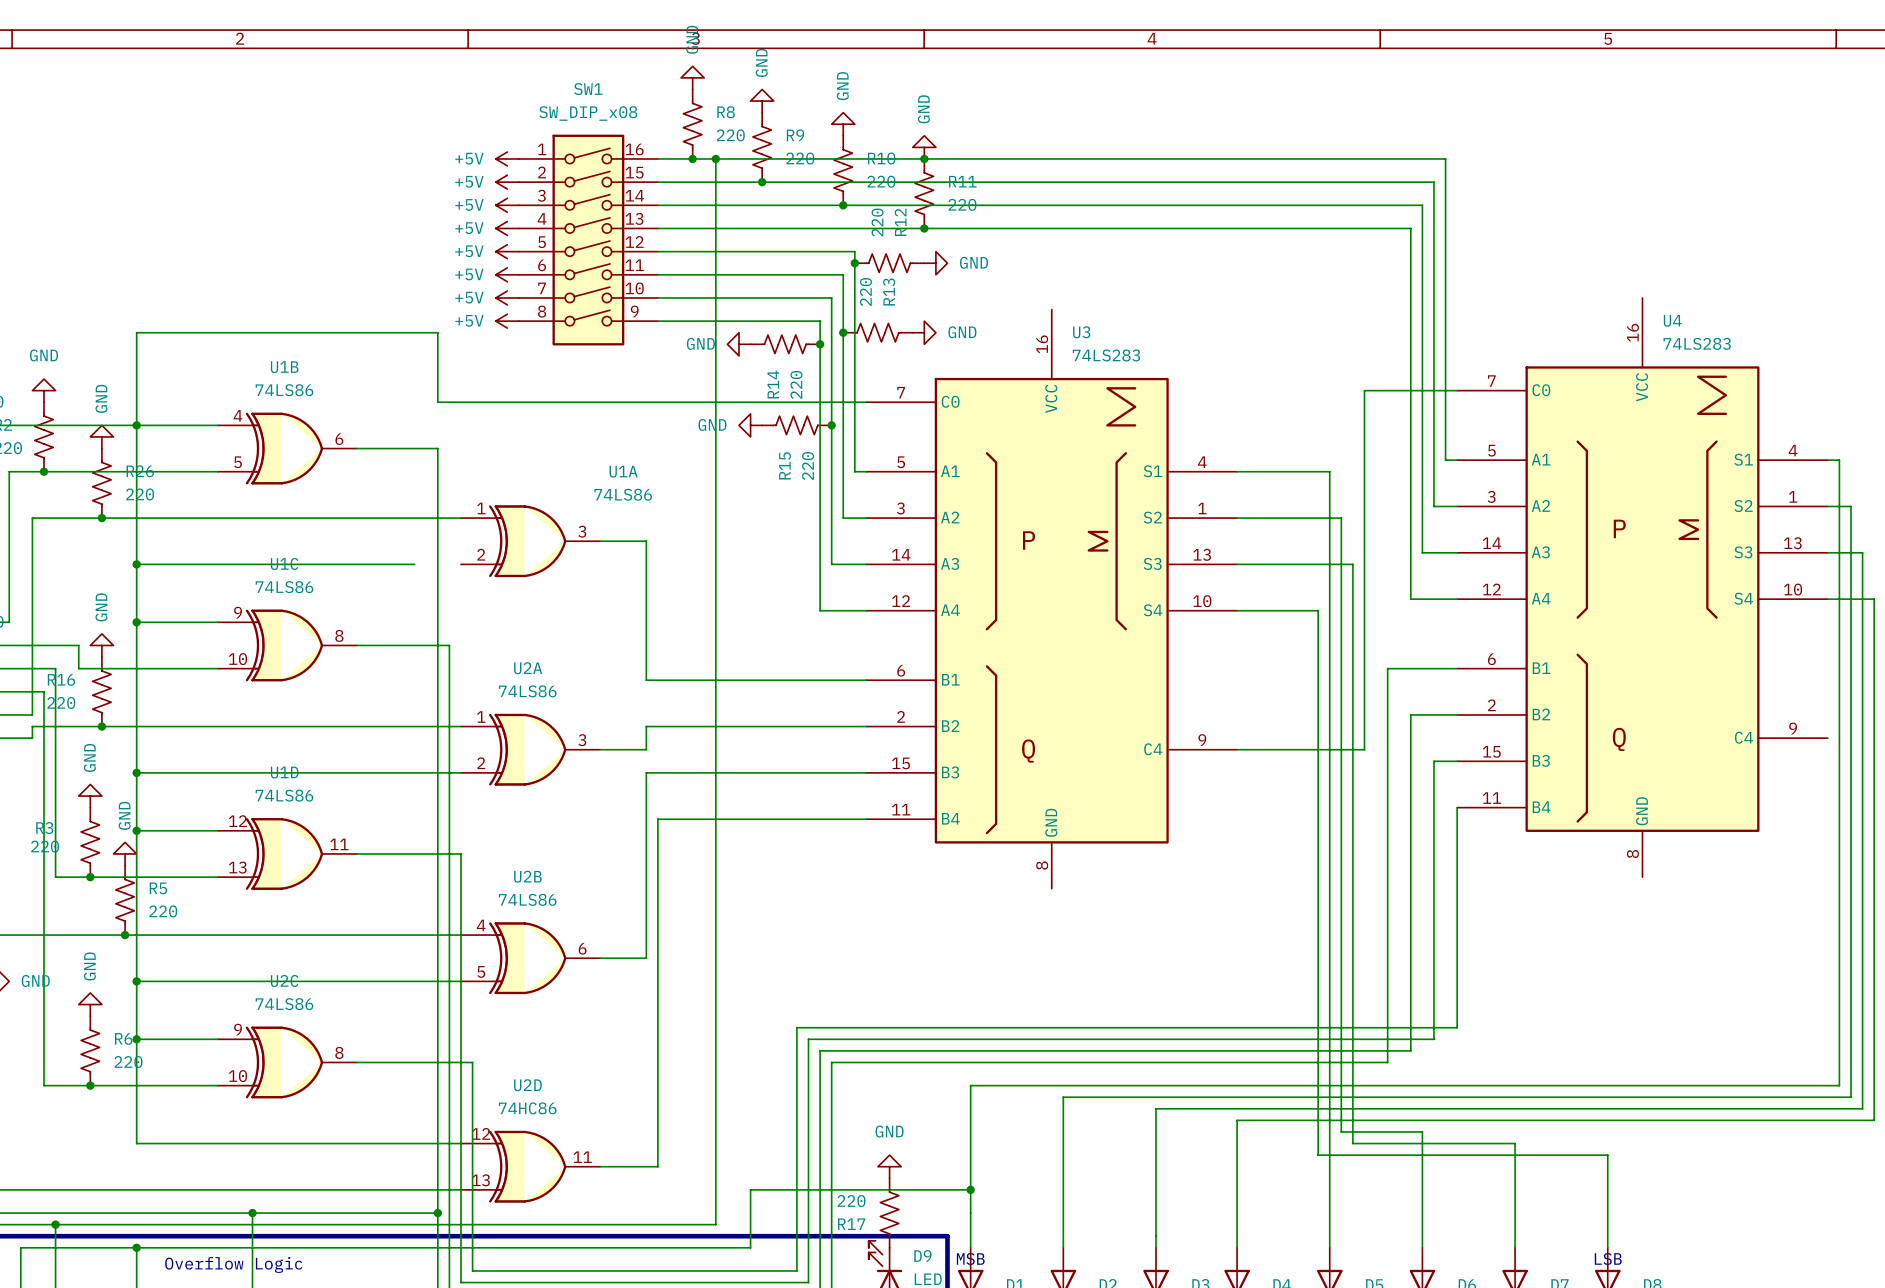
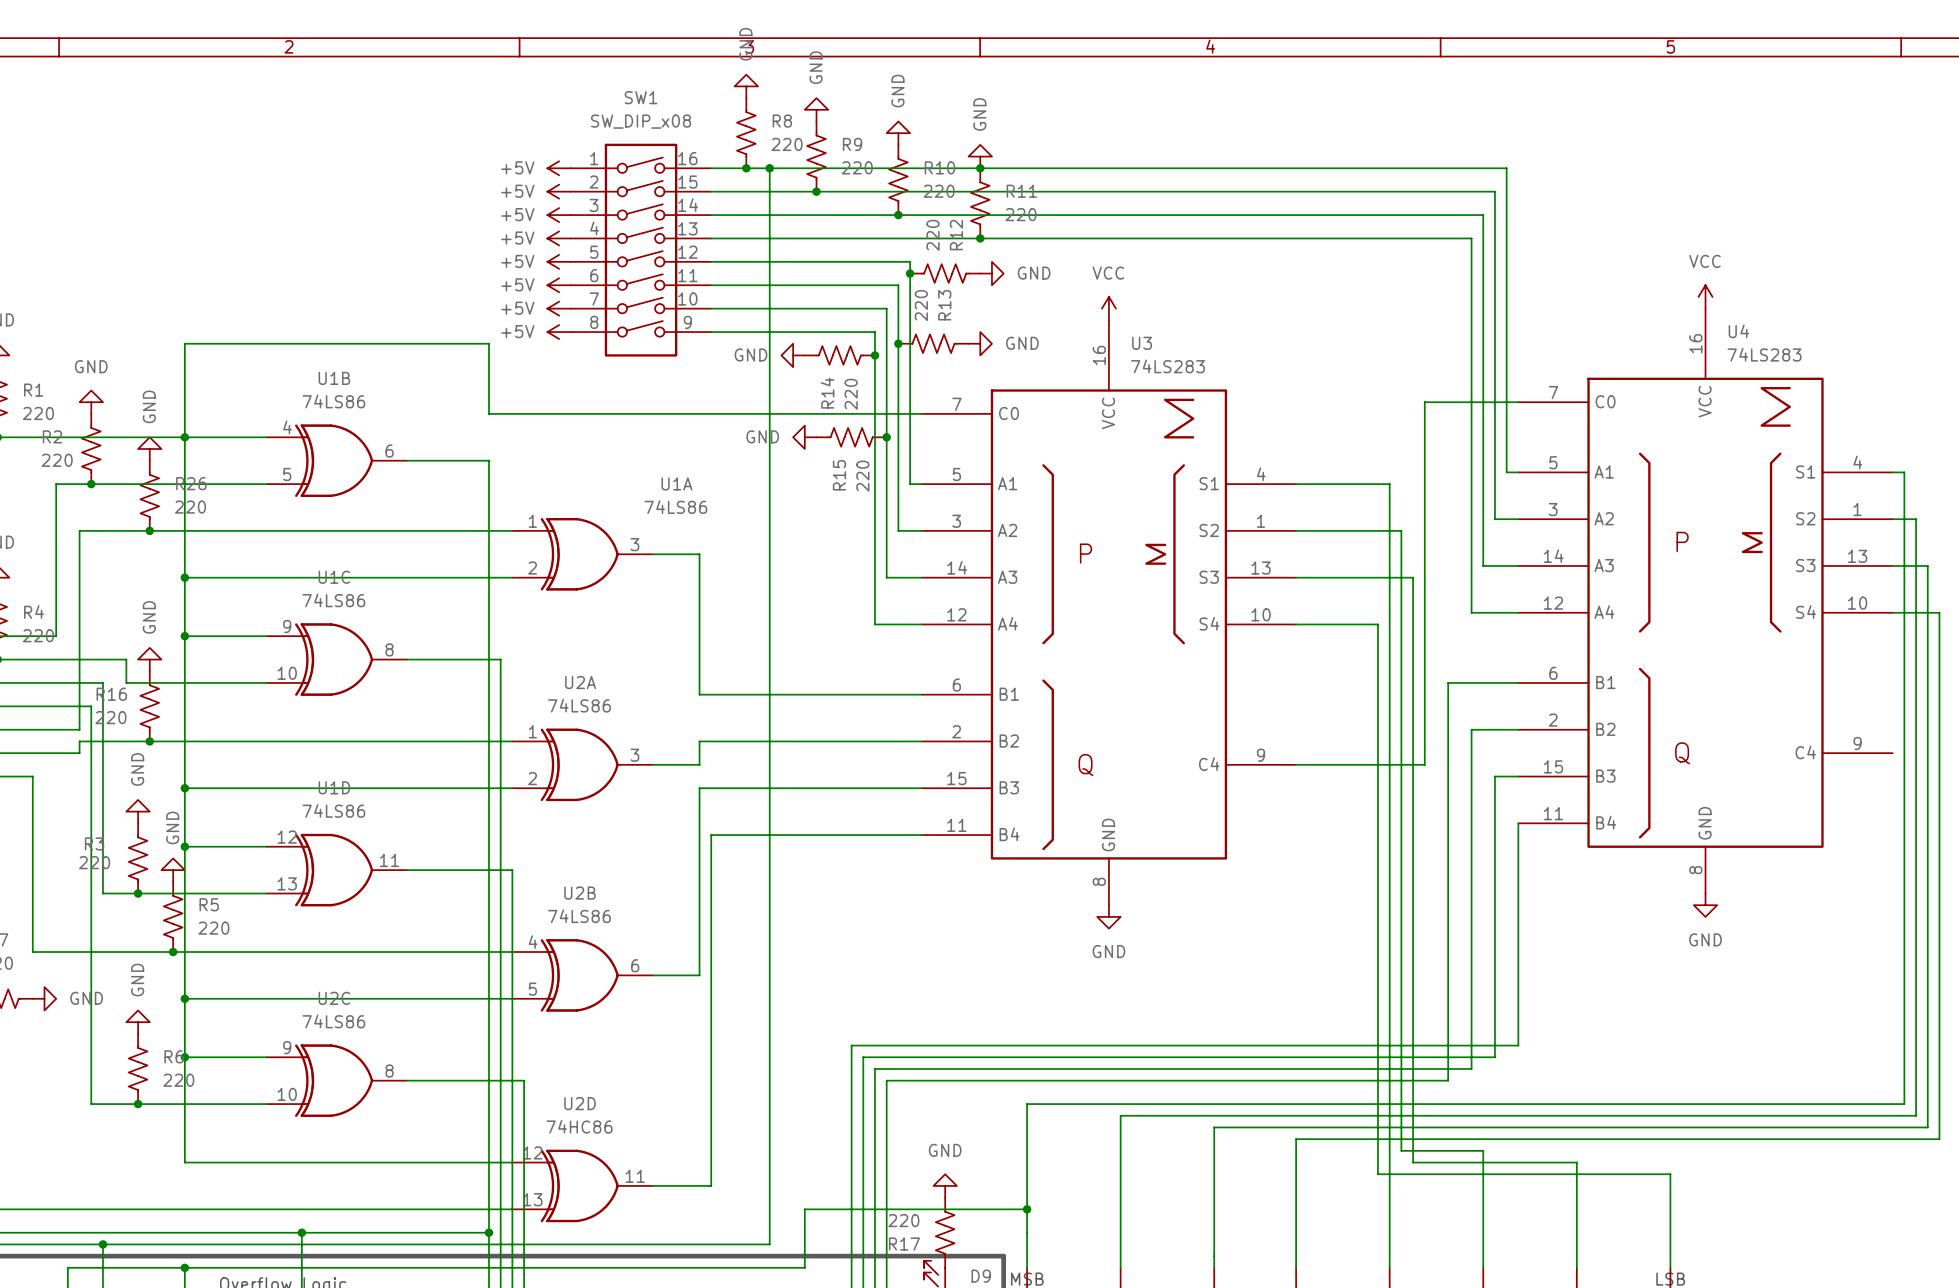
power symbol: none -> VCC (1705, 296)
power symbol: none -> VCC (1108, 308)
wire: none -> (465, 577) (512, 577)
power symbol: none -> GND (1705, 905)
power symbol: none -> GND (1108, 916)

